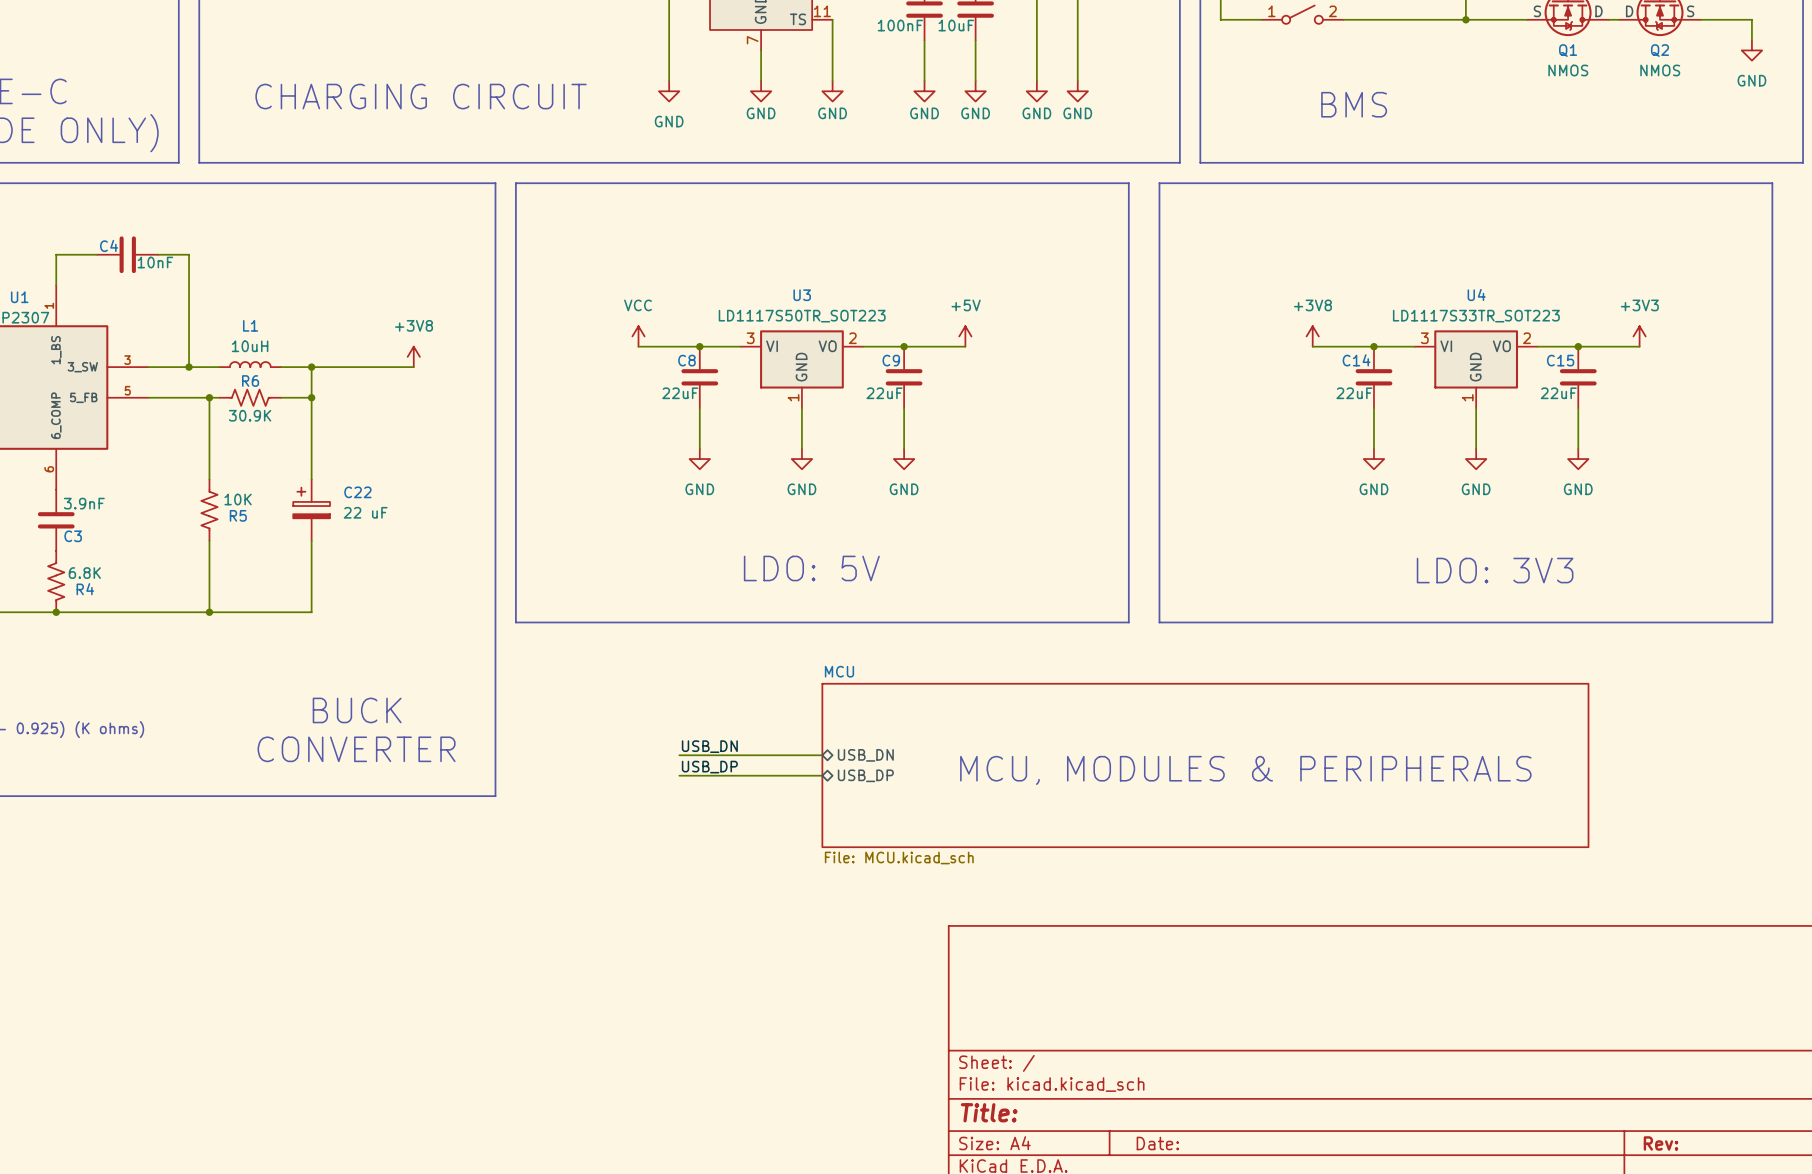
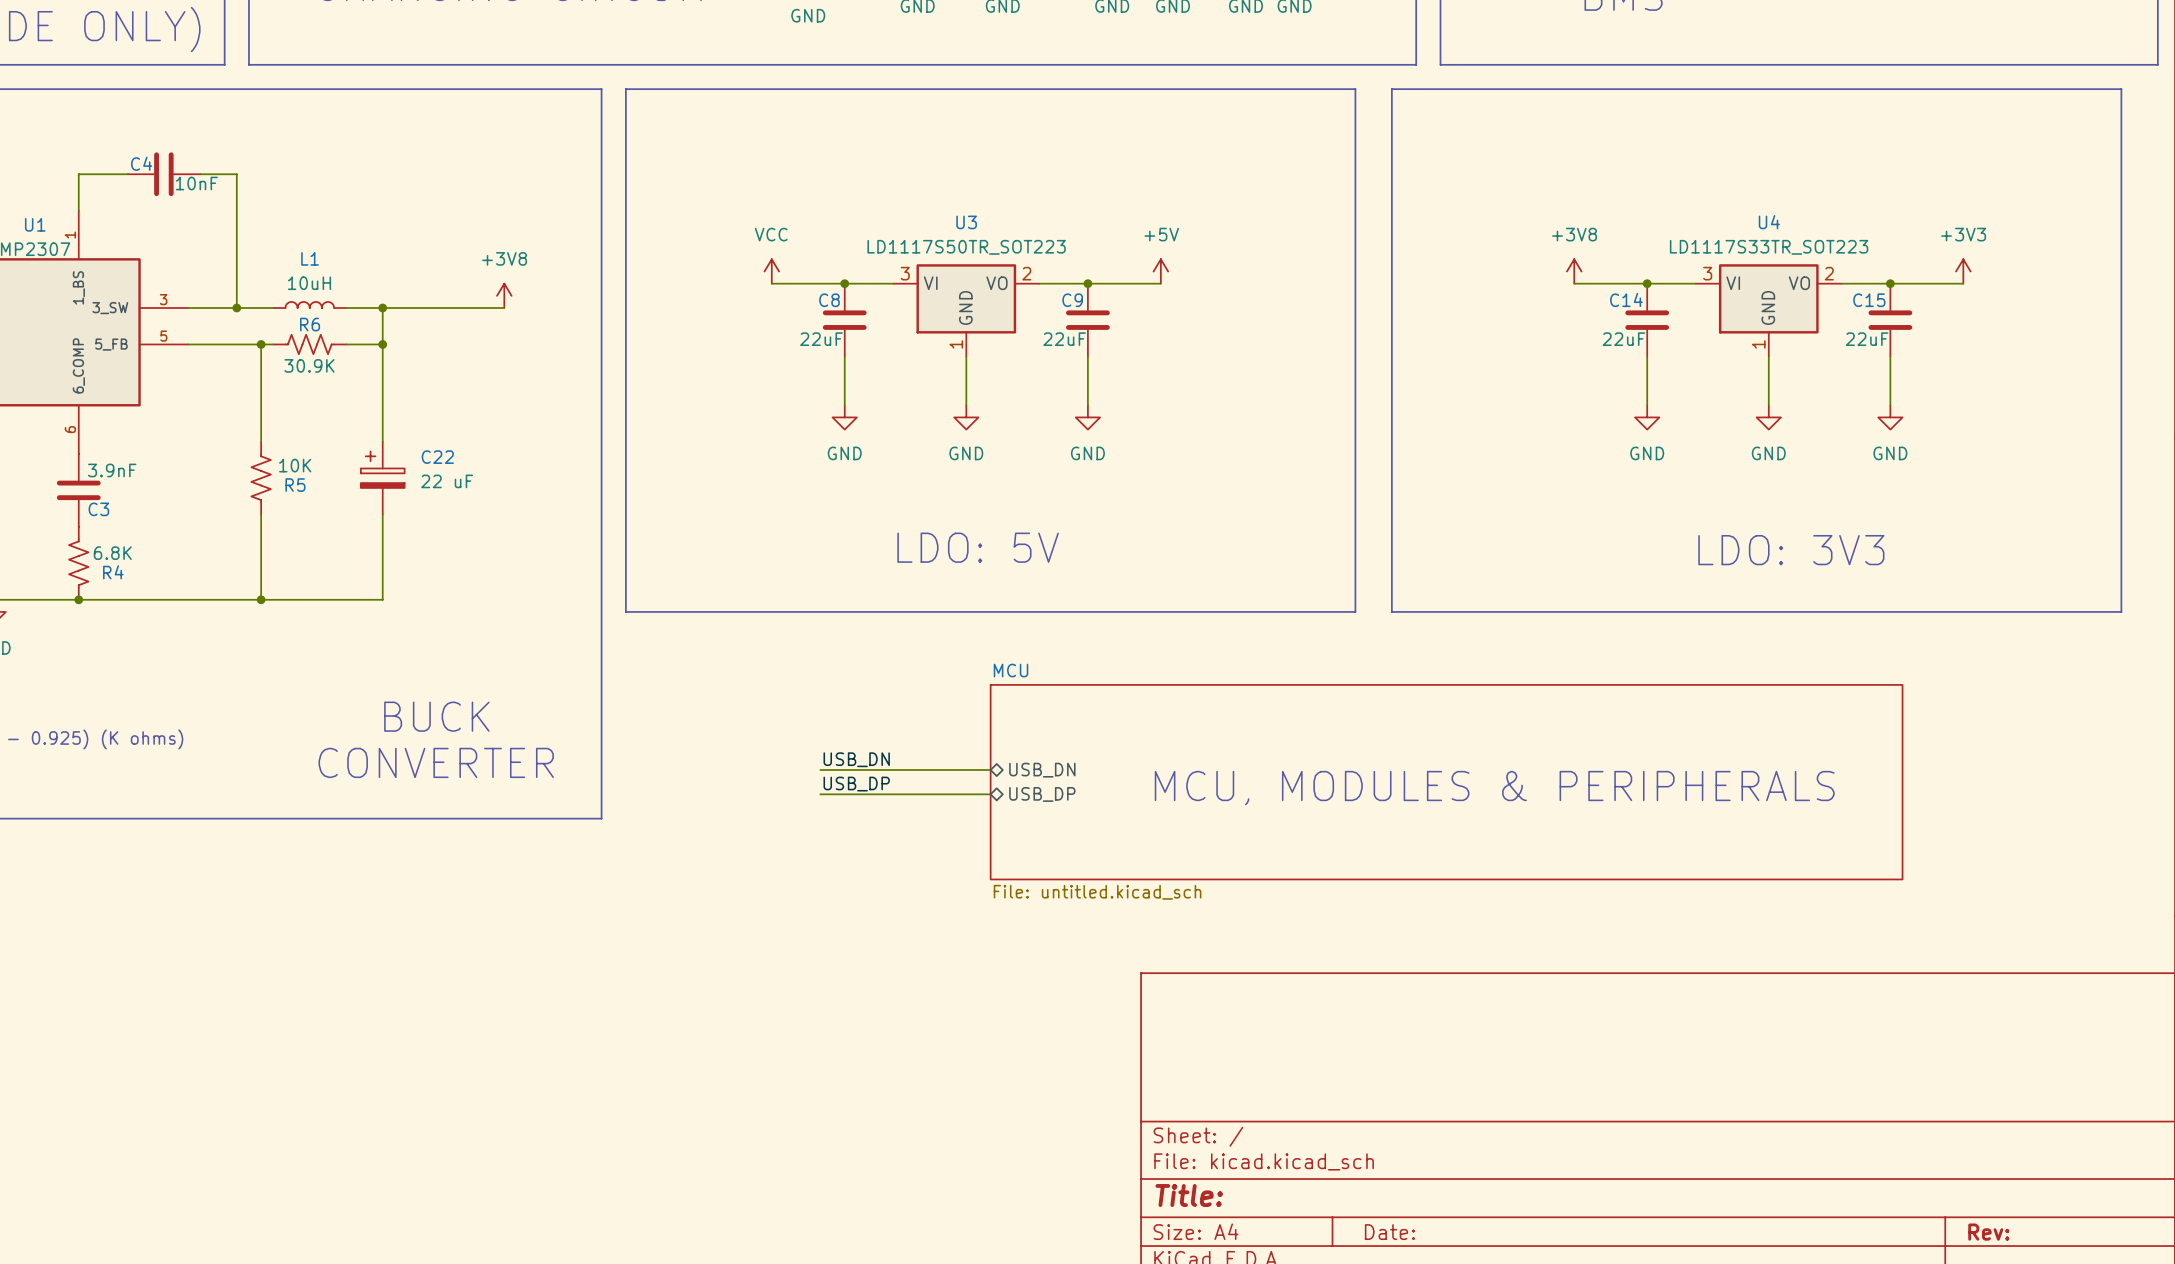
sheet MCU value: File: MCU.kicad_sch (899, 857) -> File: untitled.kicad_sch (1097, 892)

